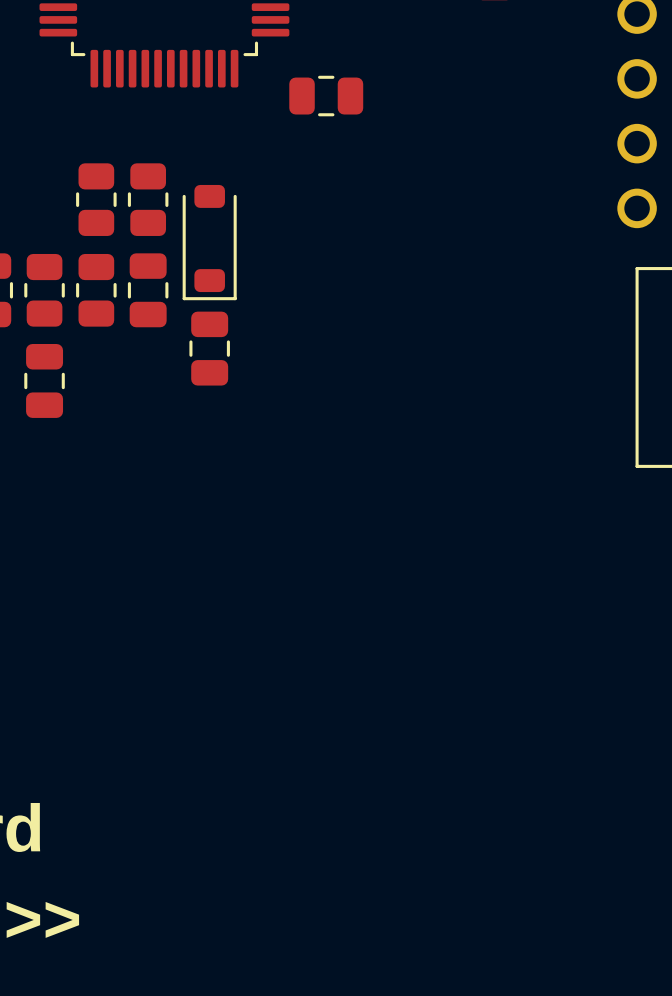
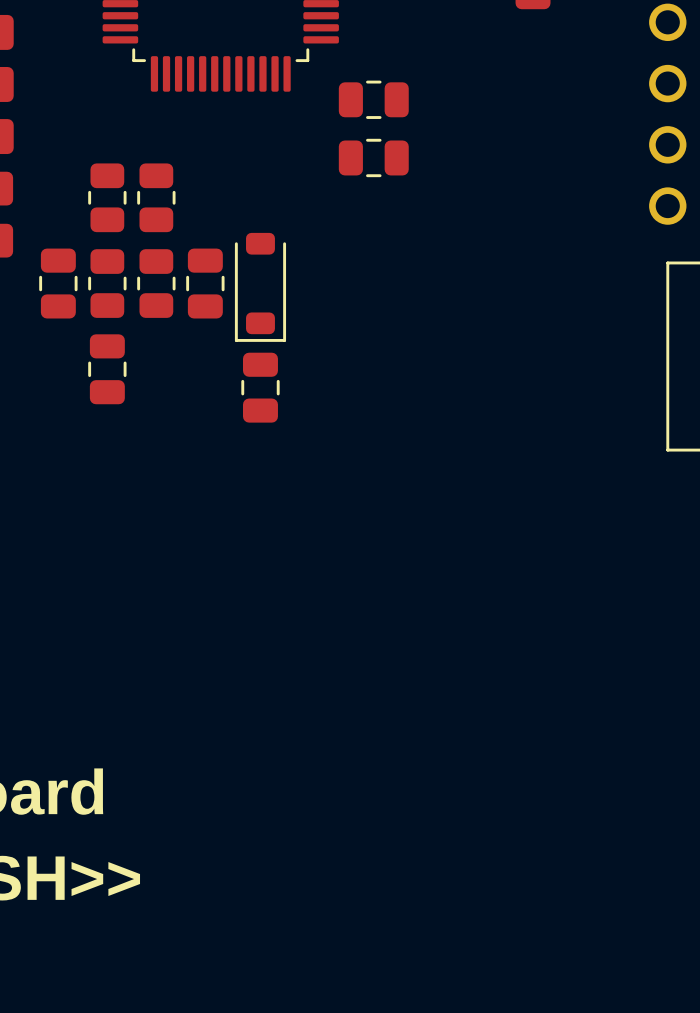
part: none -> (373, 157)
part position: (148, 199) -> (107, 197)
part position: (209, 242) -> (260, 287)
part position: (209, 348) -> (260, 387)

